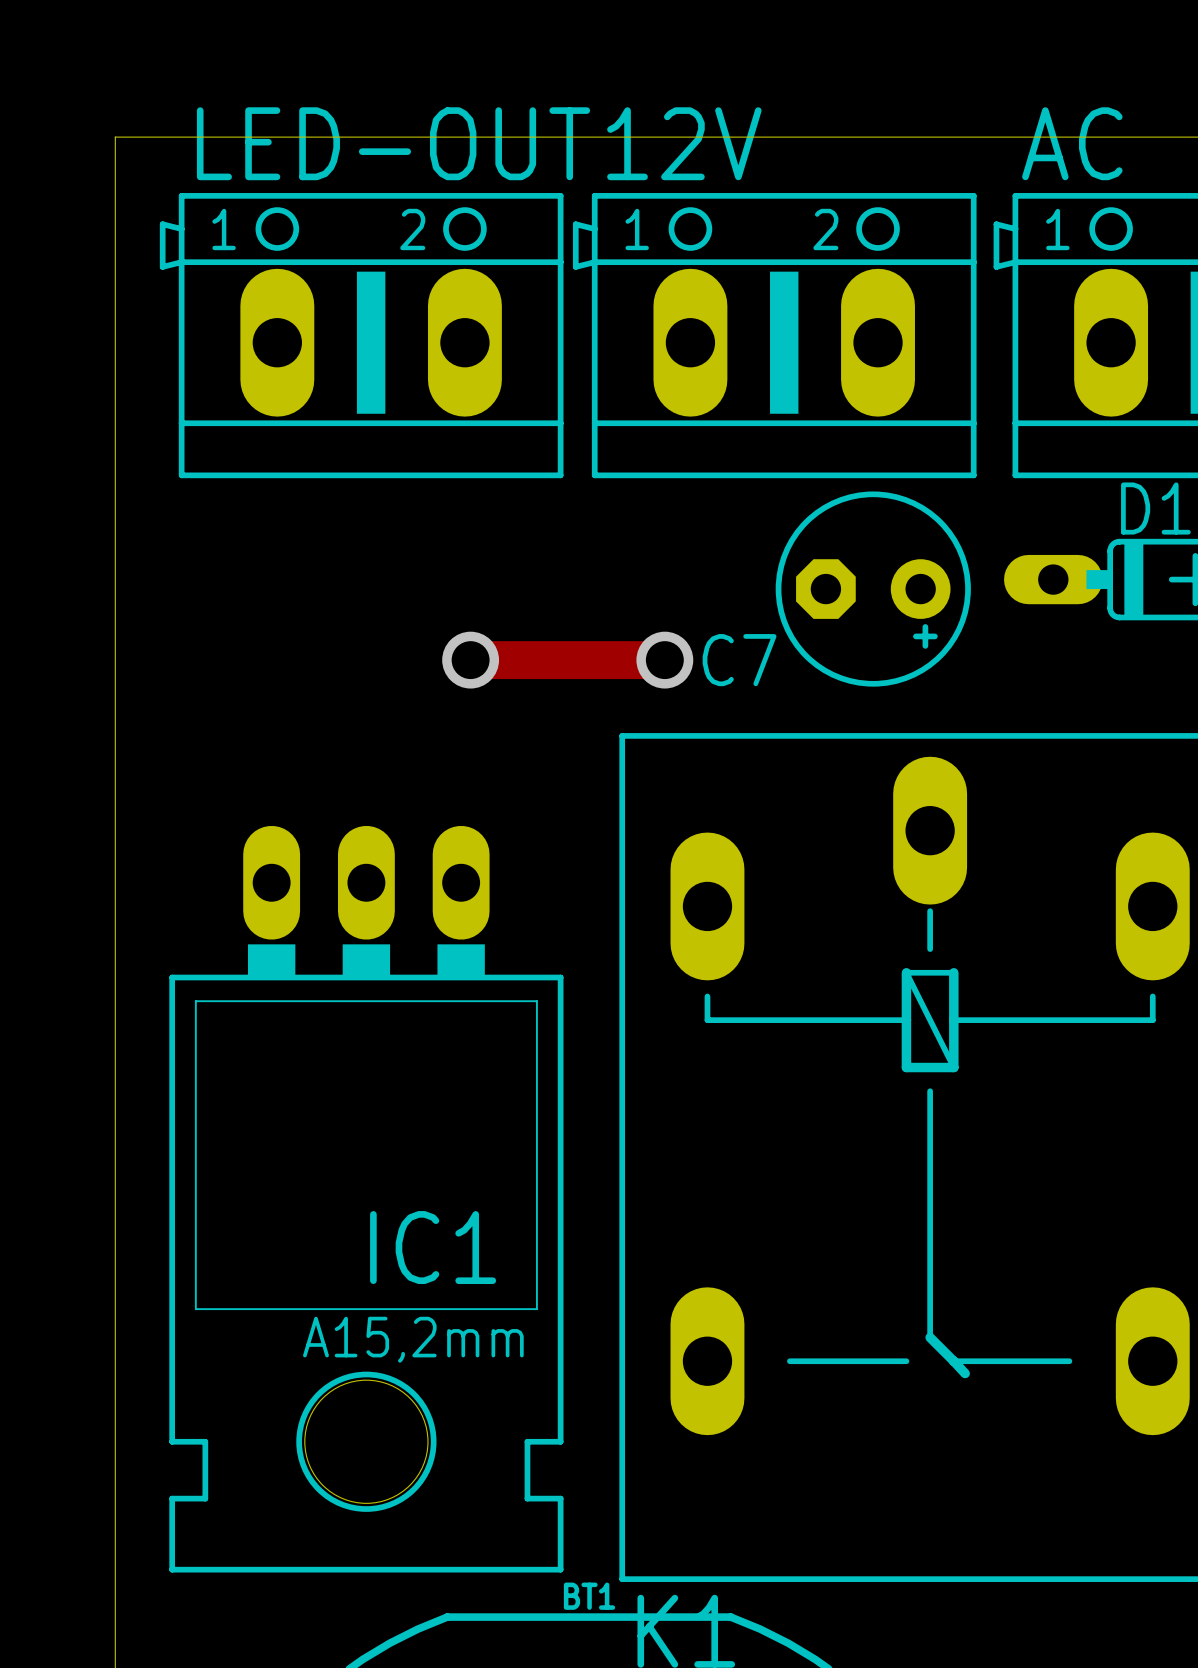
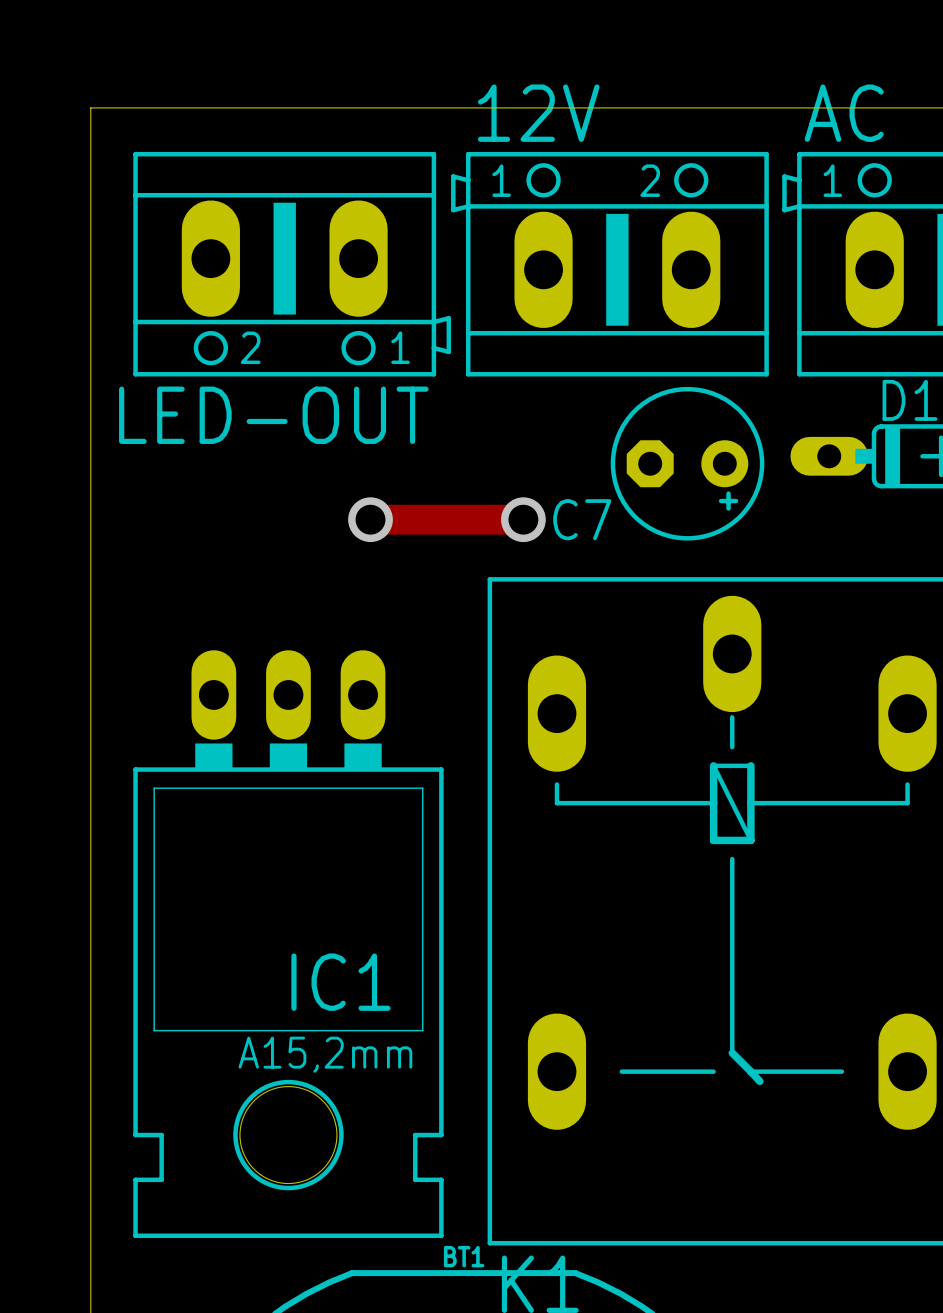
LED-OUT name position: LED-OUT (393, 143) -> LED-OUT (273, 415)
LED-OUT footprint: [159, 193, 564, 479] -> [133, 151, 452, 377]

